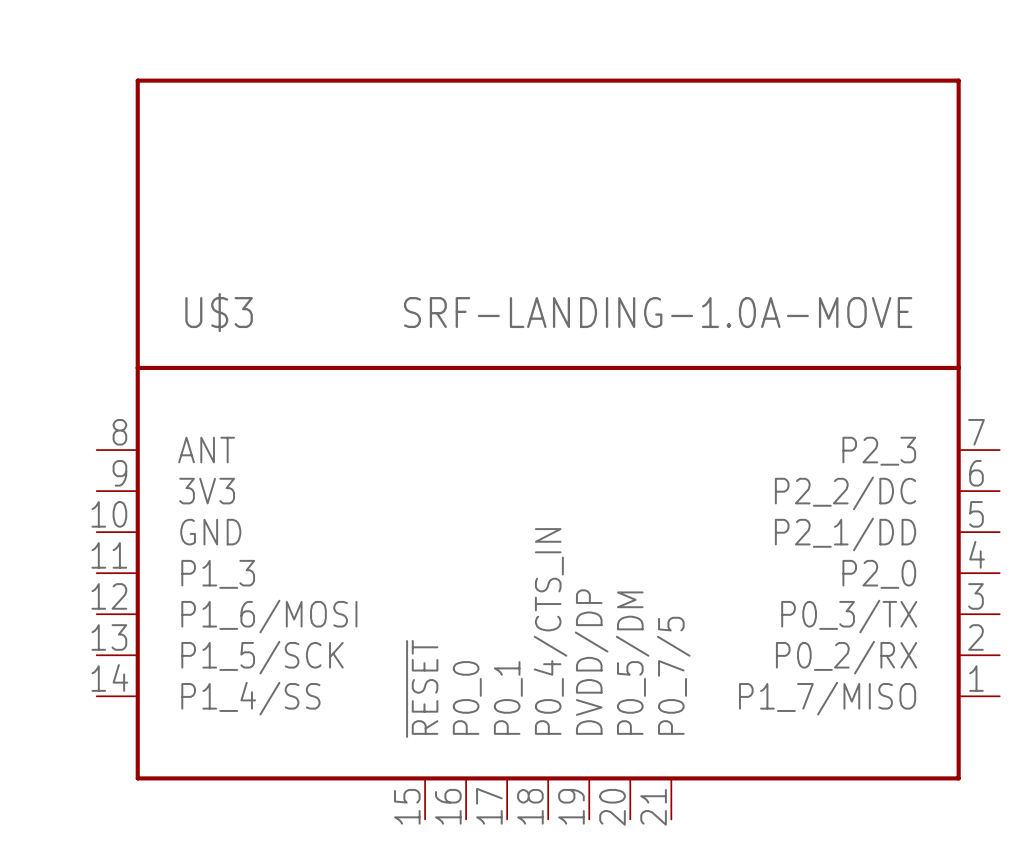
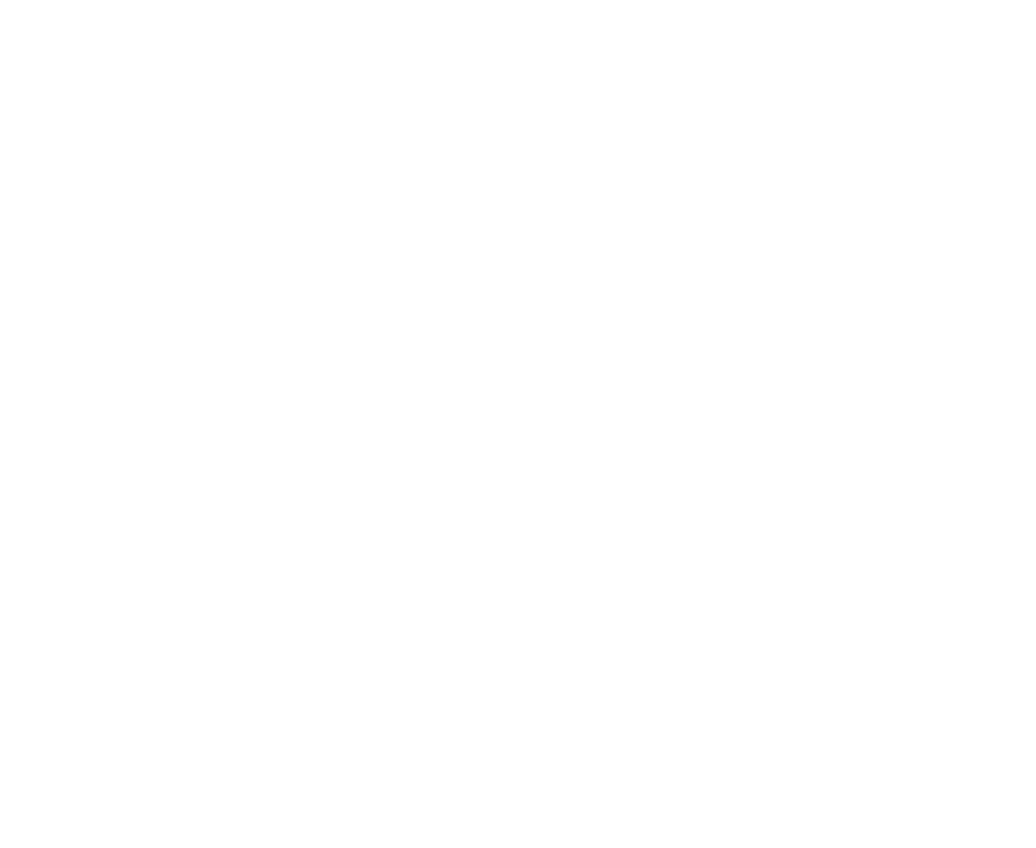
U$3: SRF-LANDING-1.0A-MOVE (548, 449) -> none

